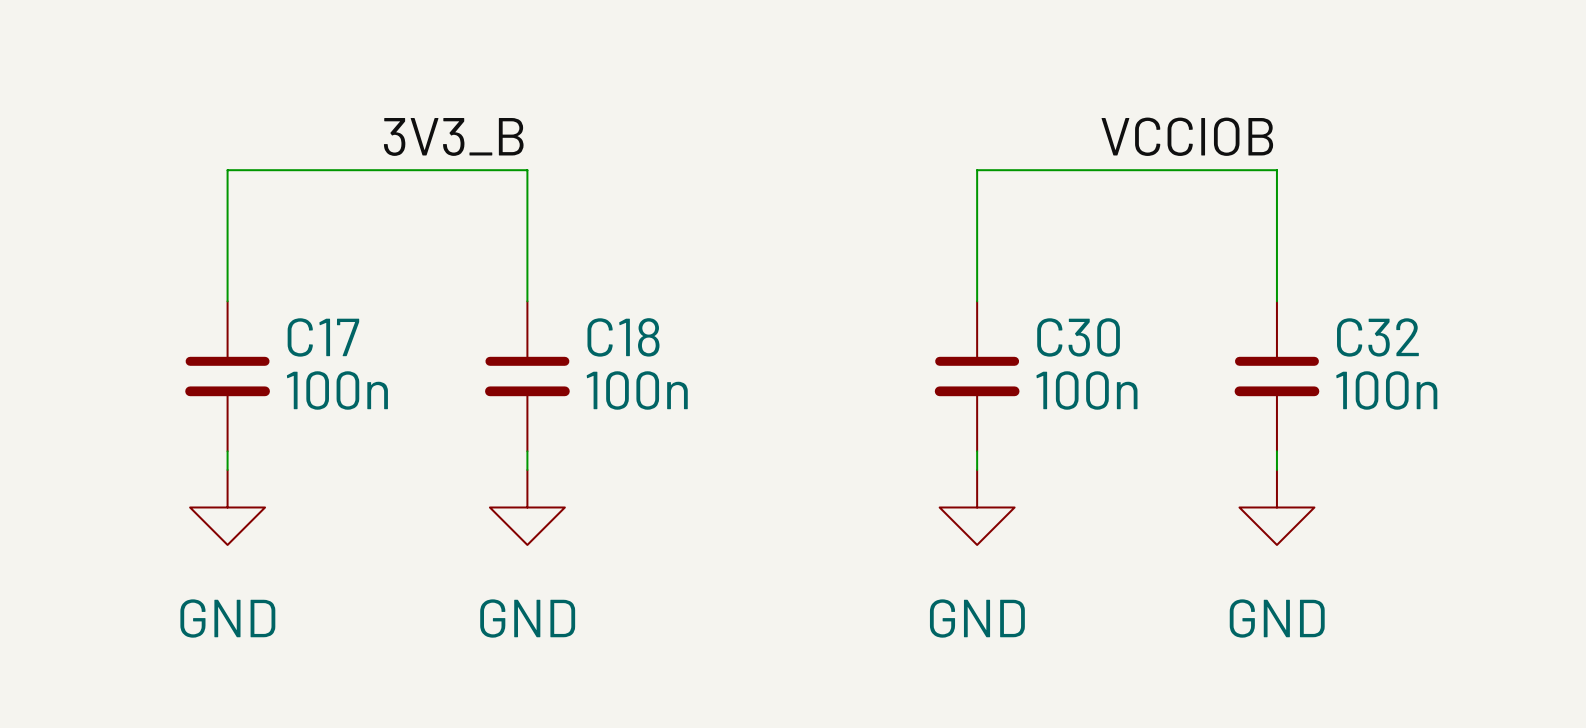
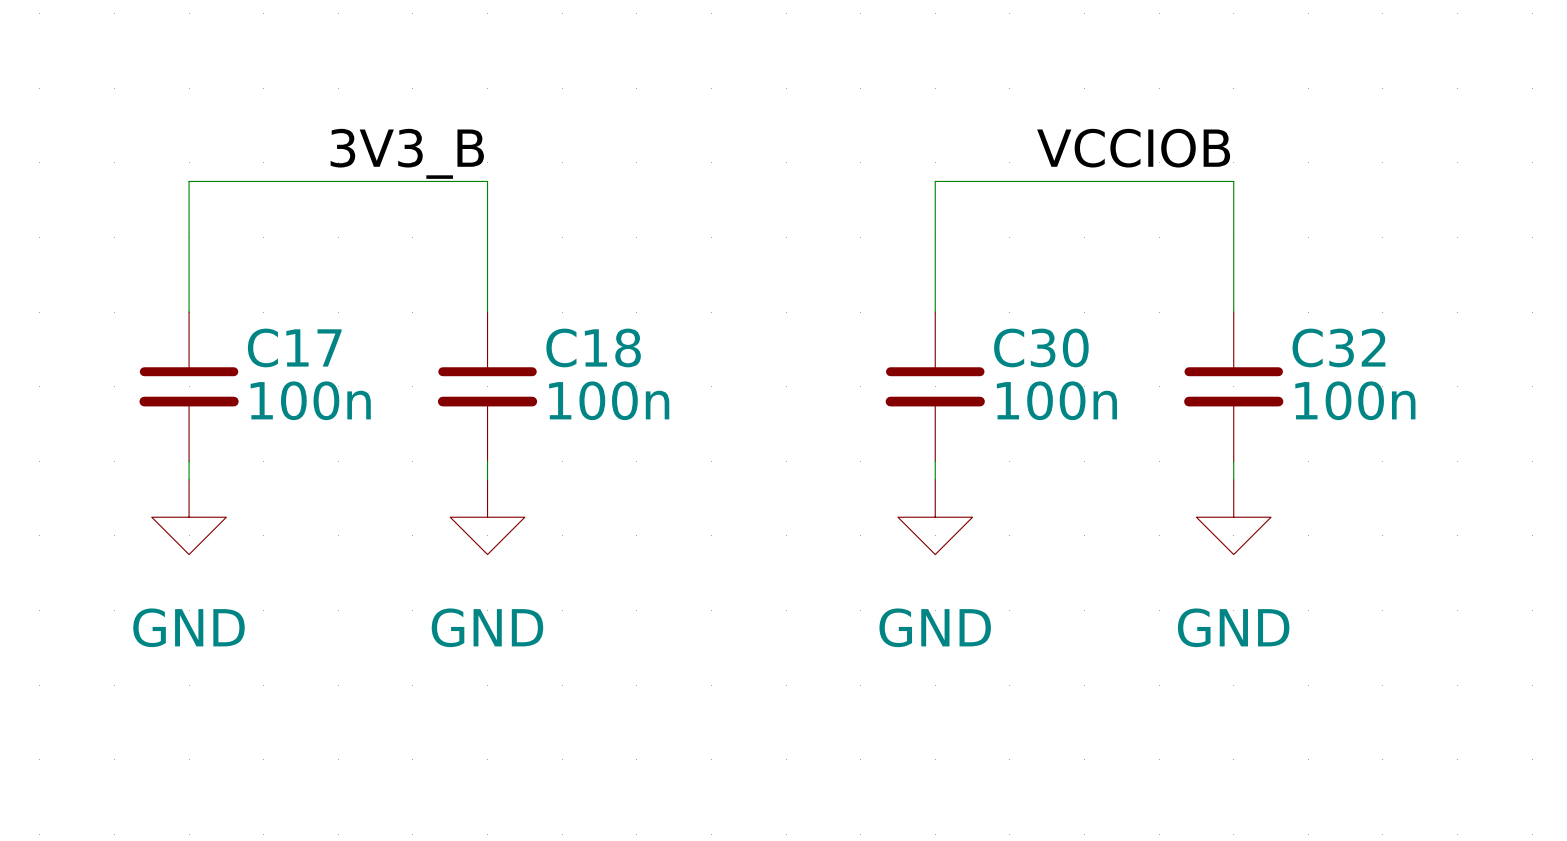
C17 symbol: [185, 301, 270, 452] -> [139, 312, 239, 462]
C18 symbol: [485, 301, 570, 452] -> [437, 312, 538, 462]
C30 symbol: [934, 301, 1020, 452] -> [885, 312, 985, 462]
C32 symbol: [1234, 301, 1320, 452] -> [1184, 312, 1284, 462]

